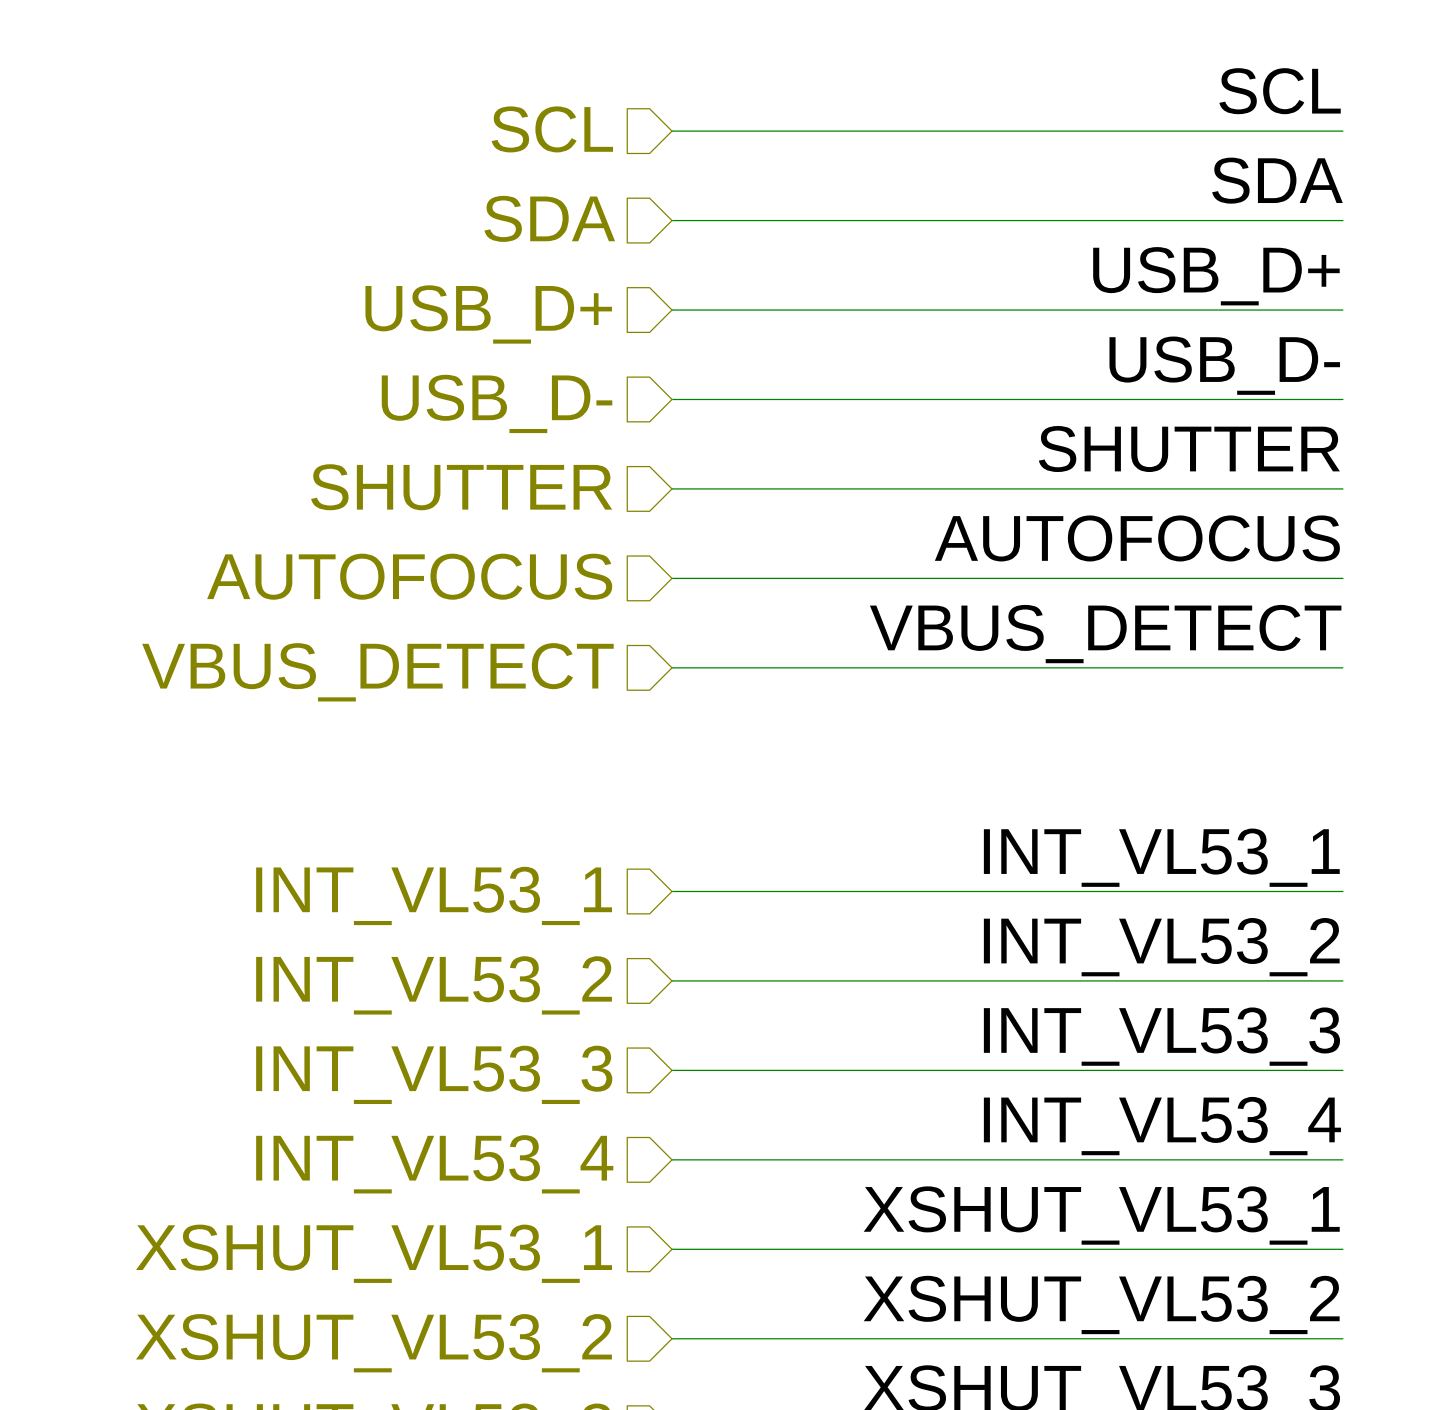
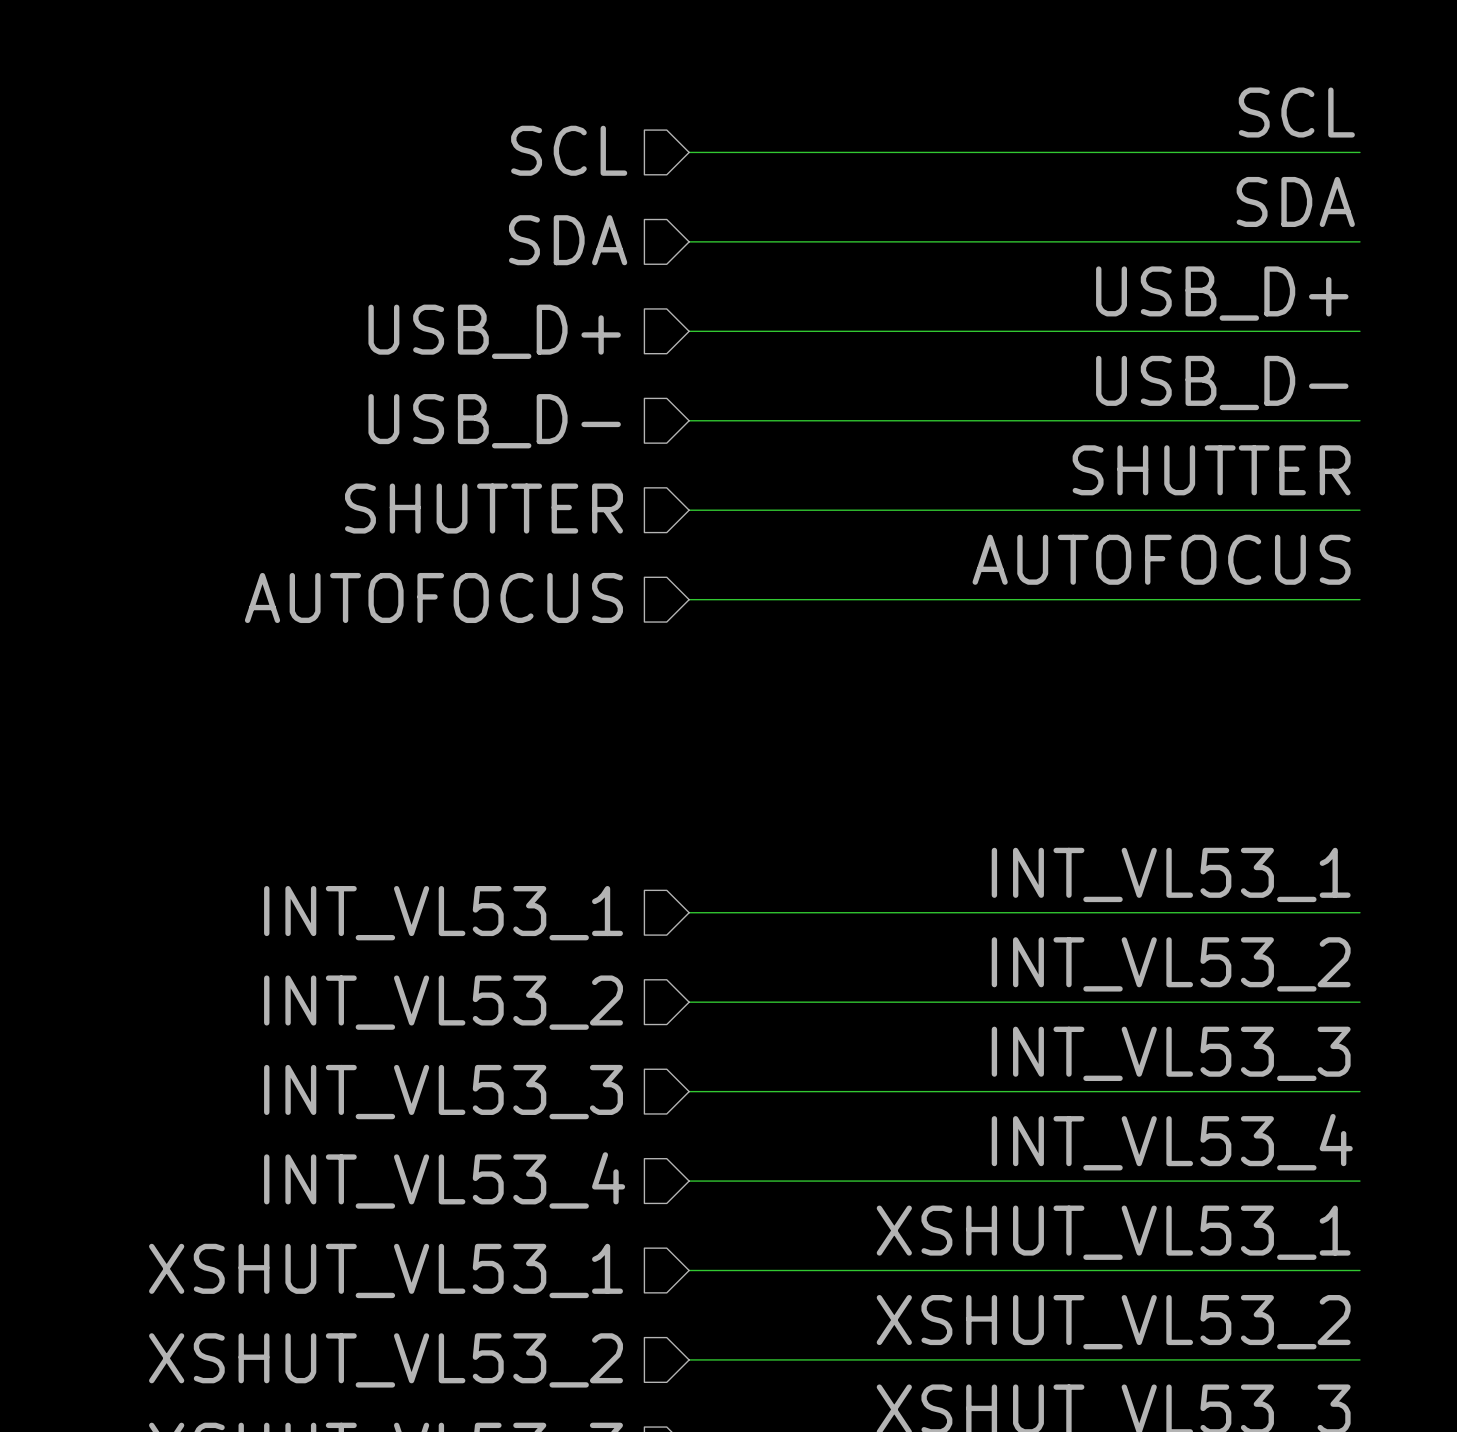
label: VBUS_DETECT (1105, 634) -> none
wire: (671, 667) (1342, 667) -> none
hierarchical label: VBUS_DETECT (377, 672) -> none

